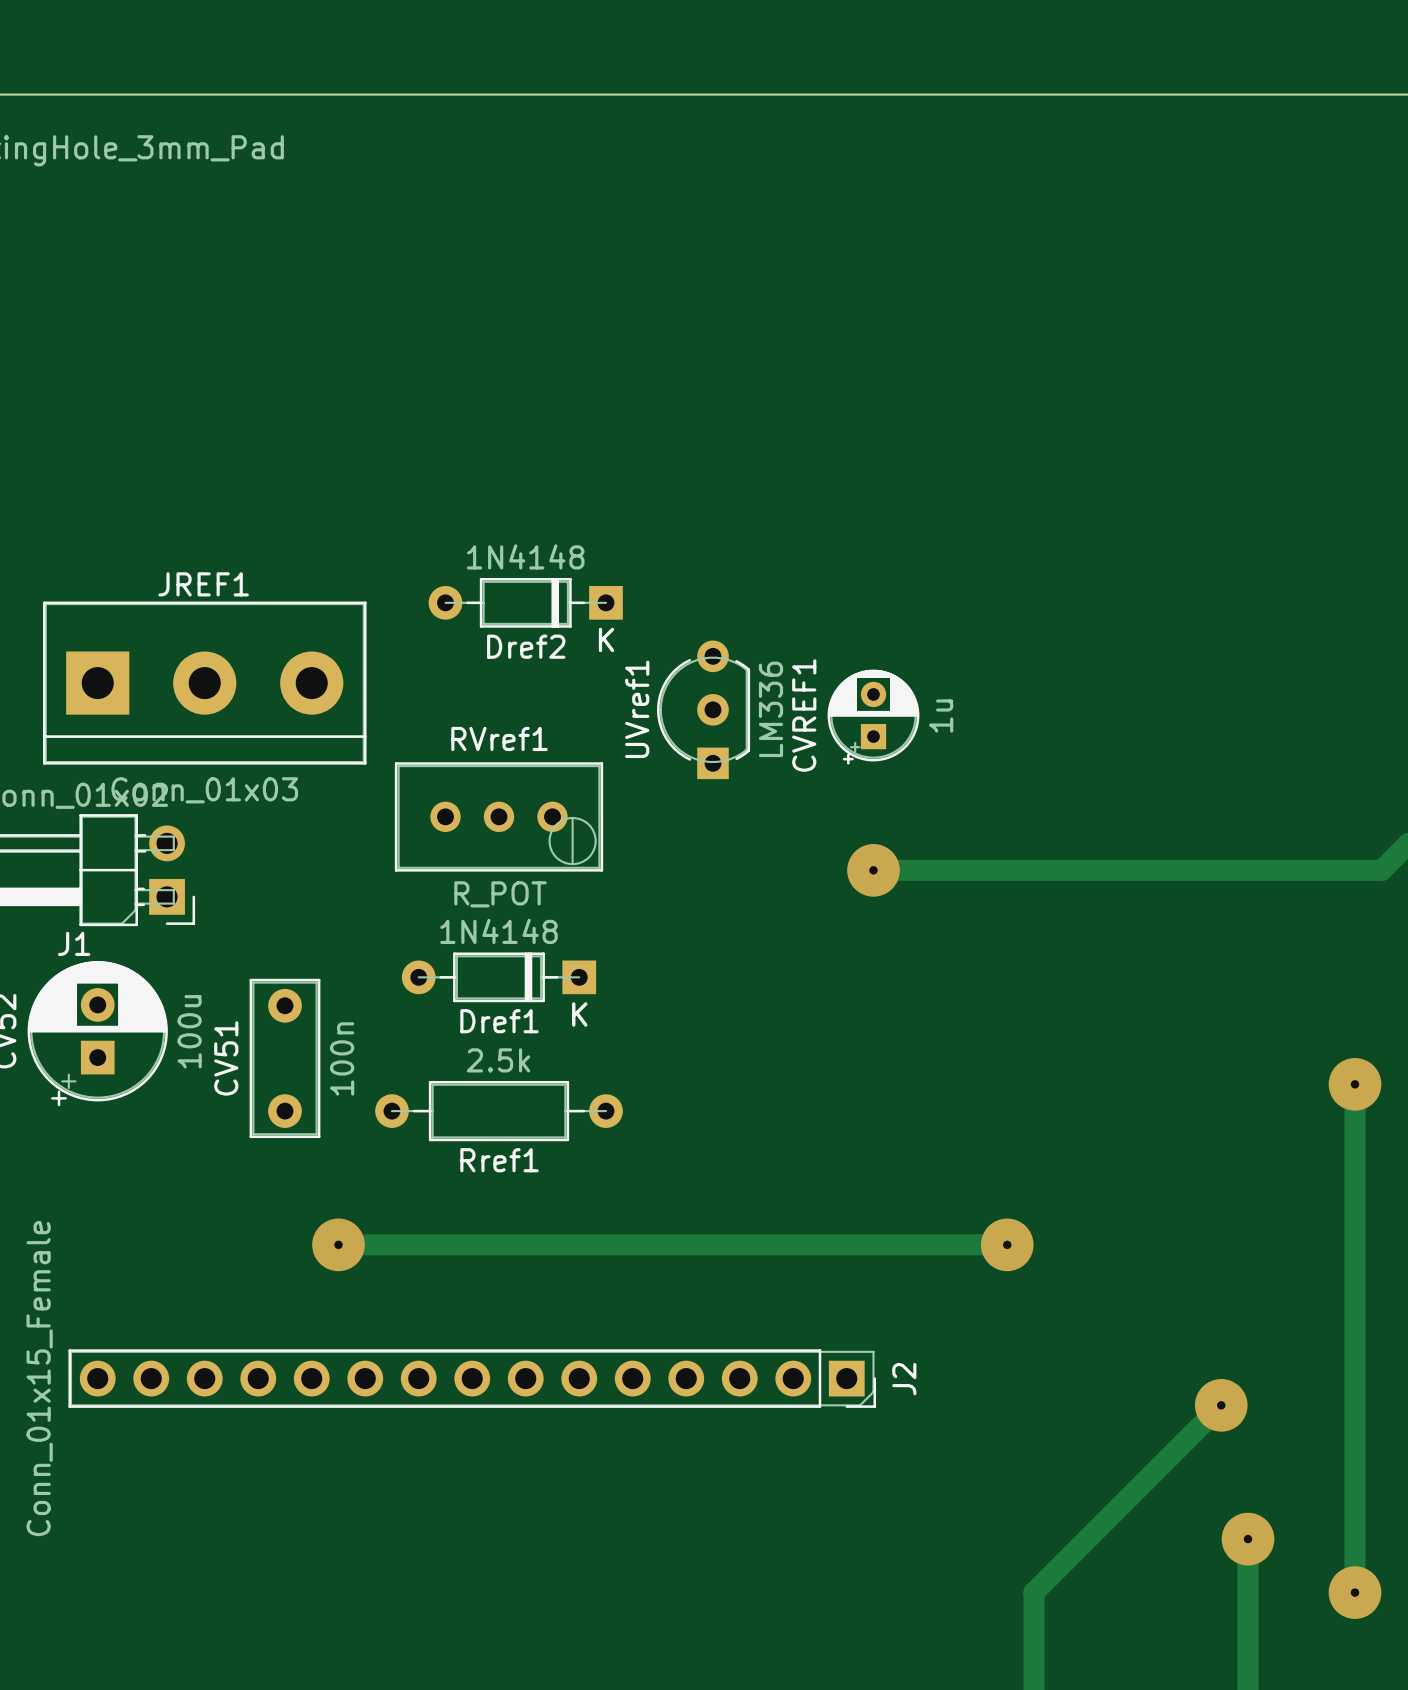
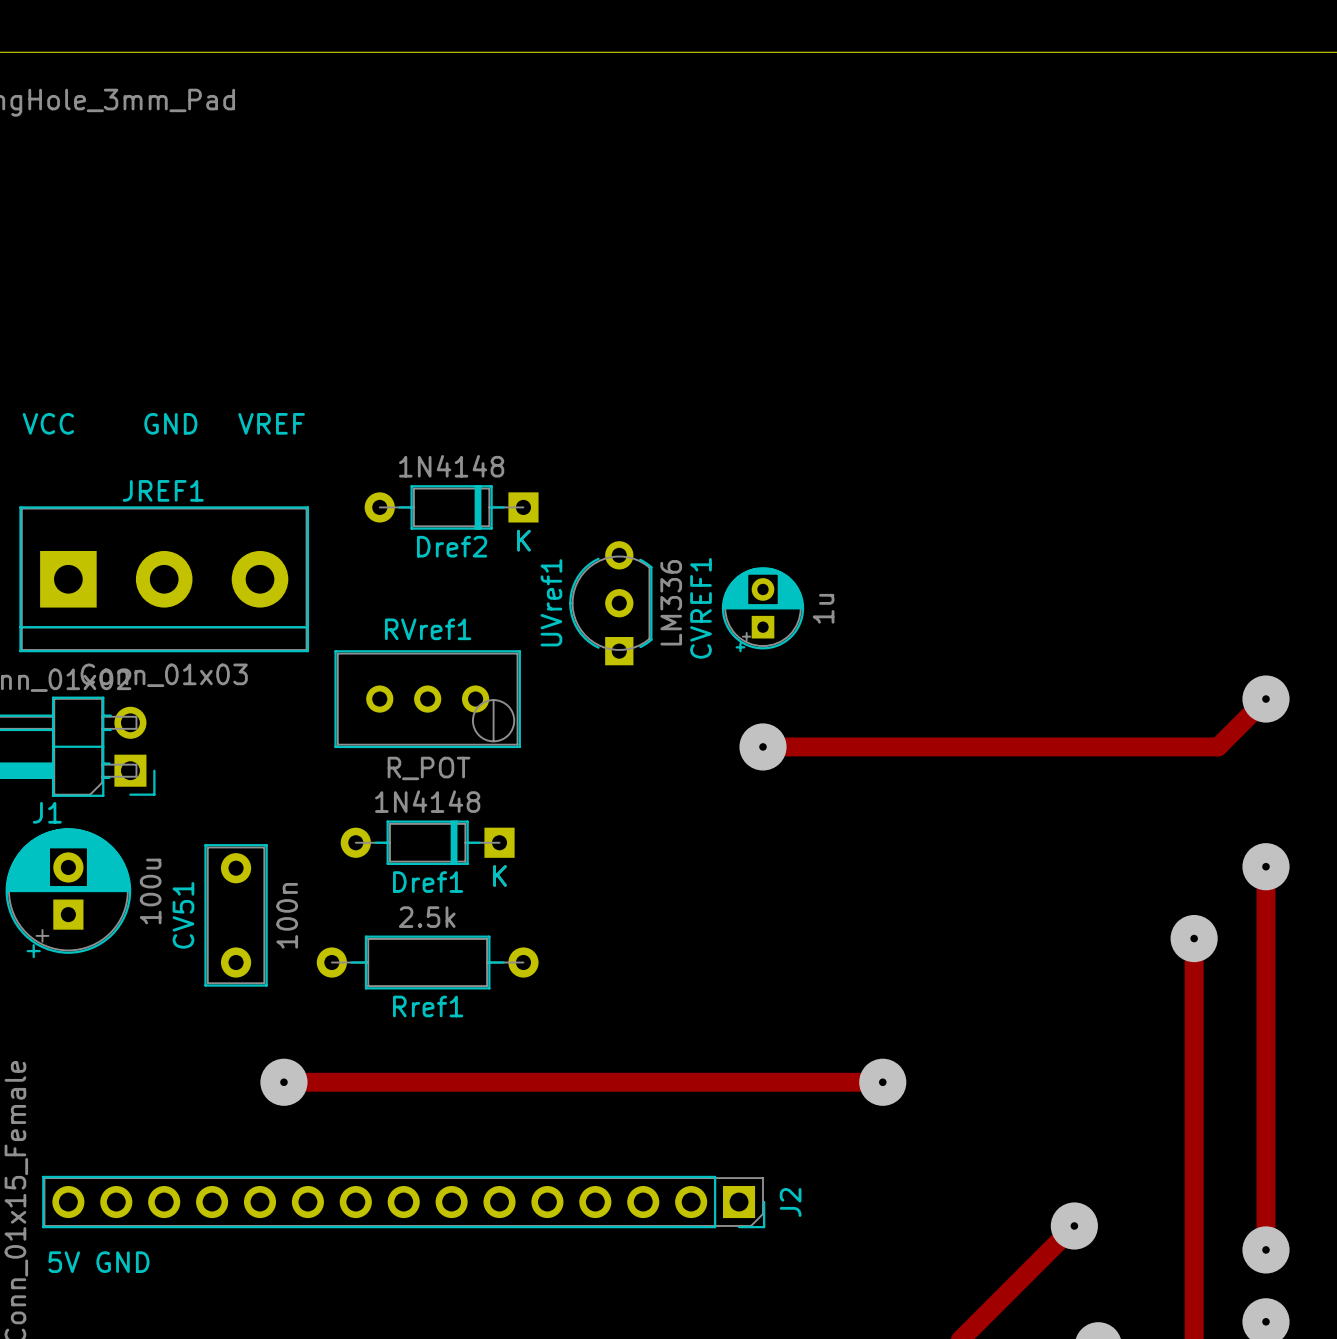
text: none -> VCC (48, 423)
text: none -> GND (170, 423)
text: none -> VREF (271, 423)
text: none -> 5V (64, 1262)
text: none -> GND (122, 1262)

